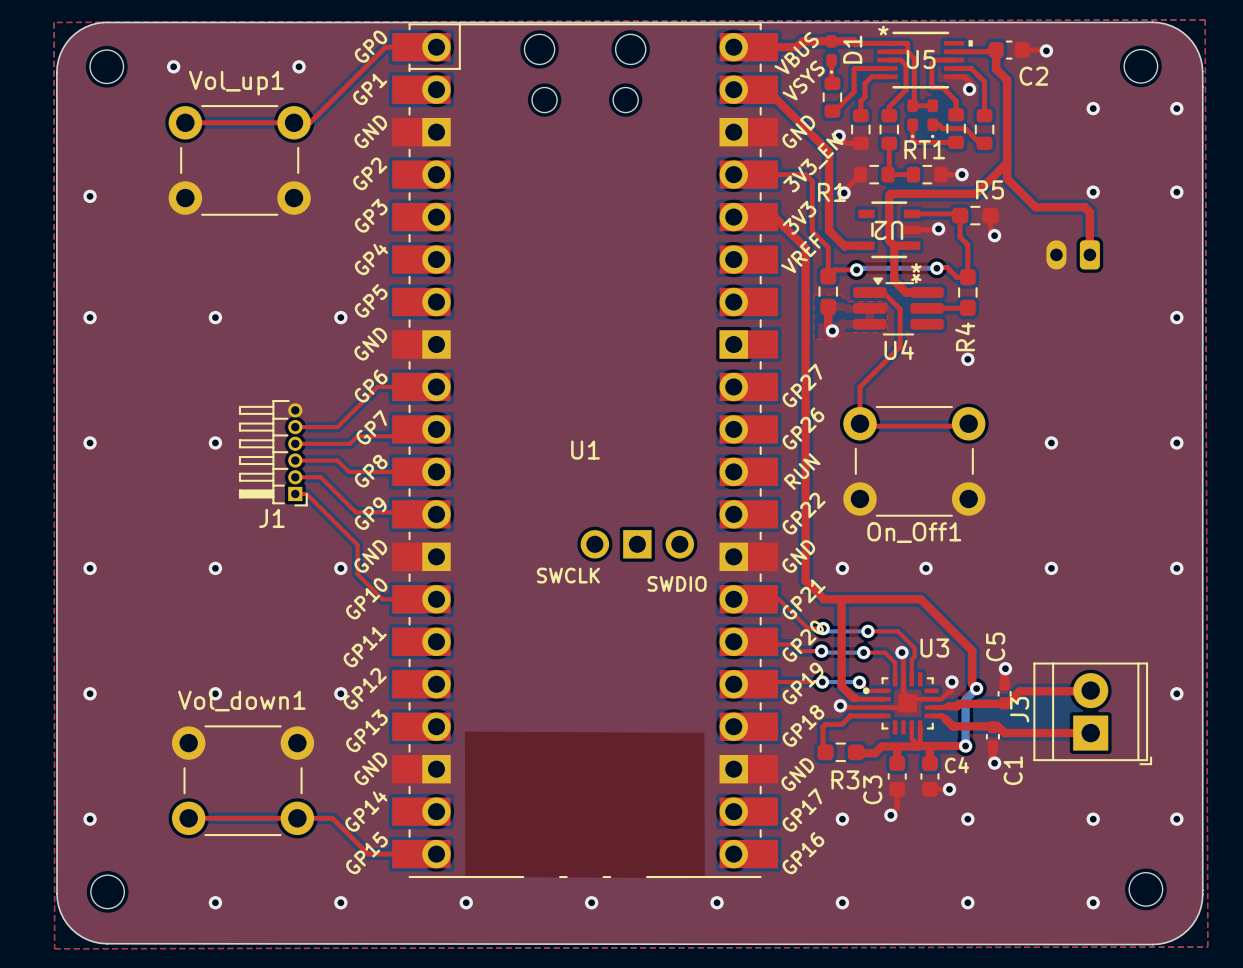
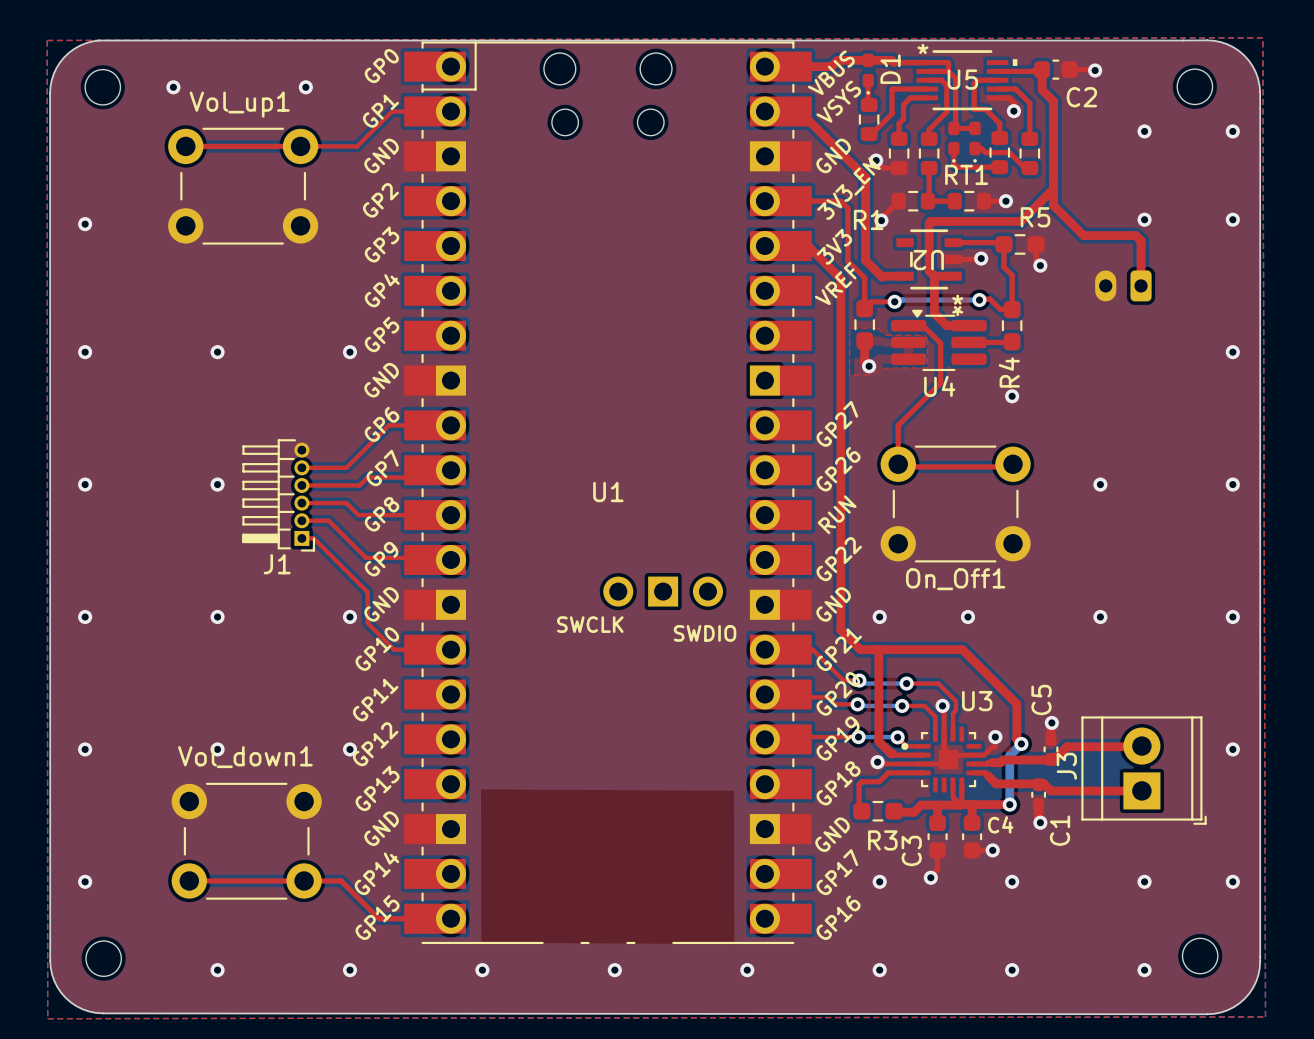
top track: (436, 47) (385, 47) (309, 122) -> none
top track: none -> (450, 111) (392, 111) (357, 146) (300, 146)

